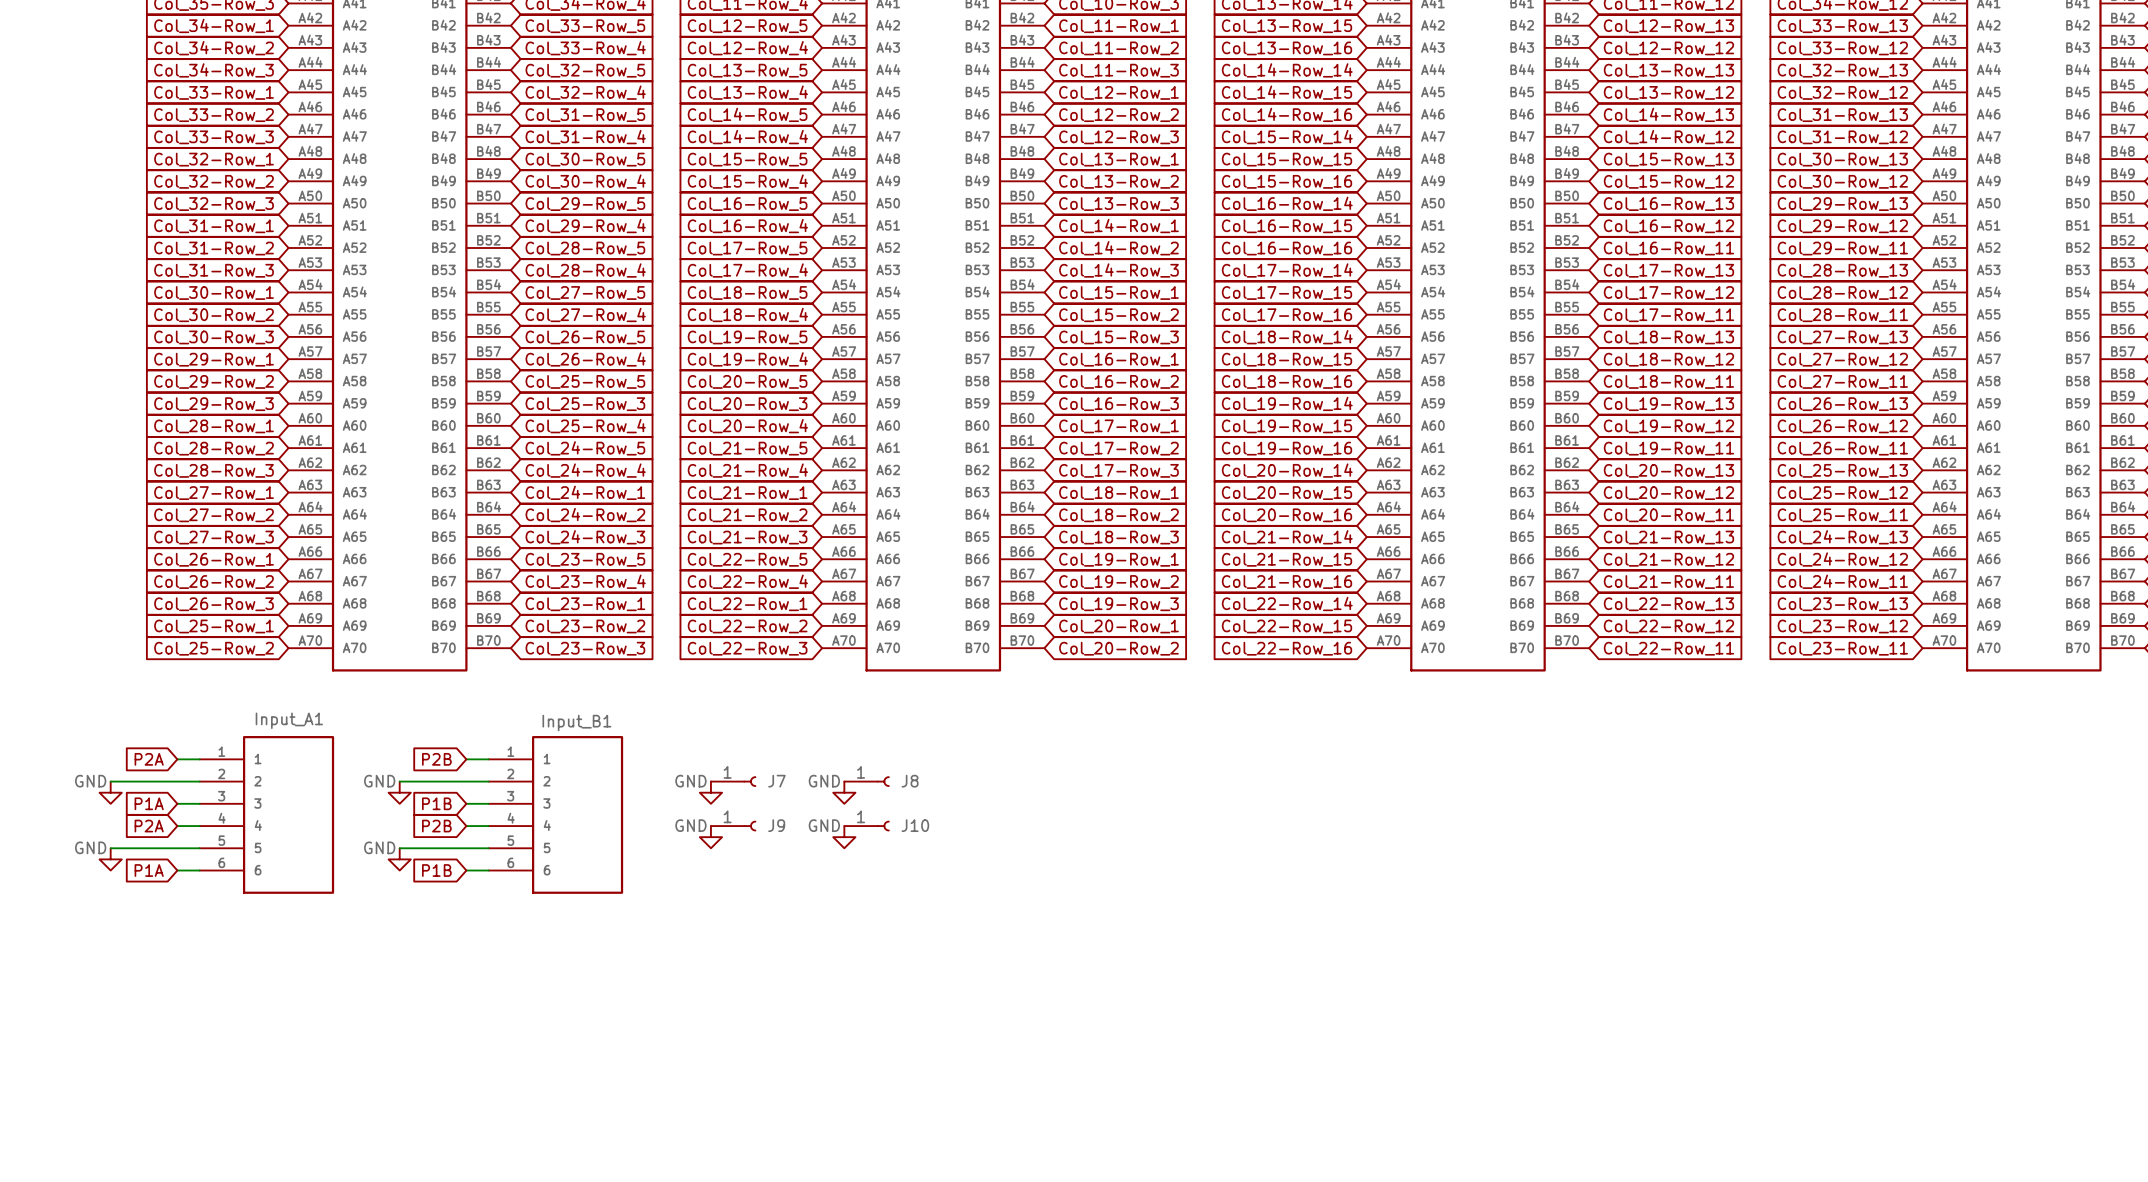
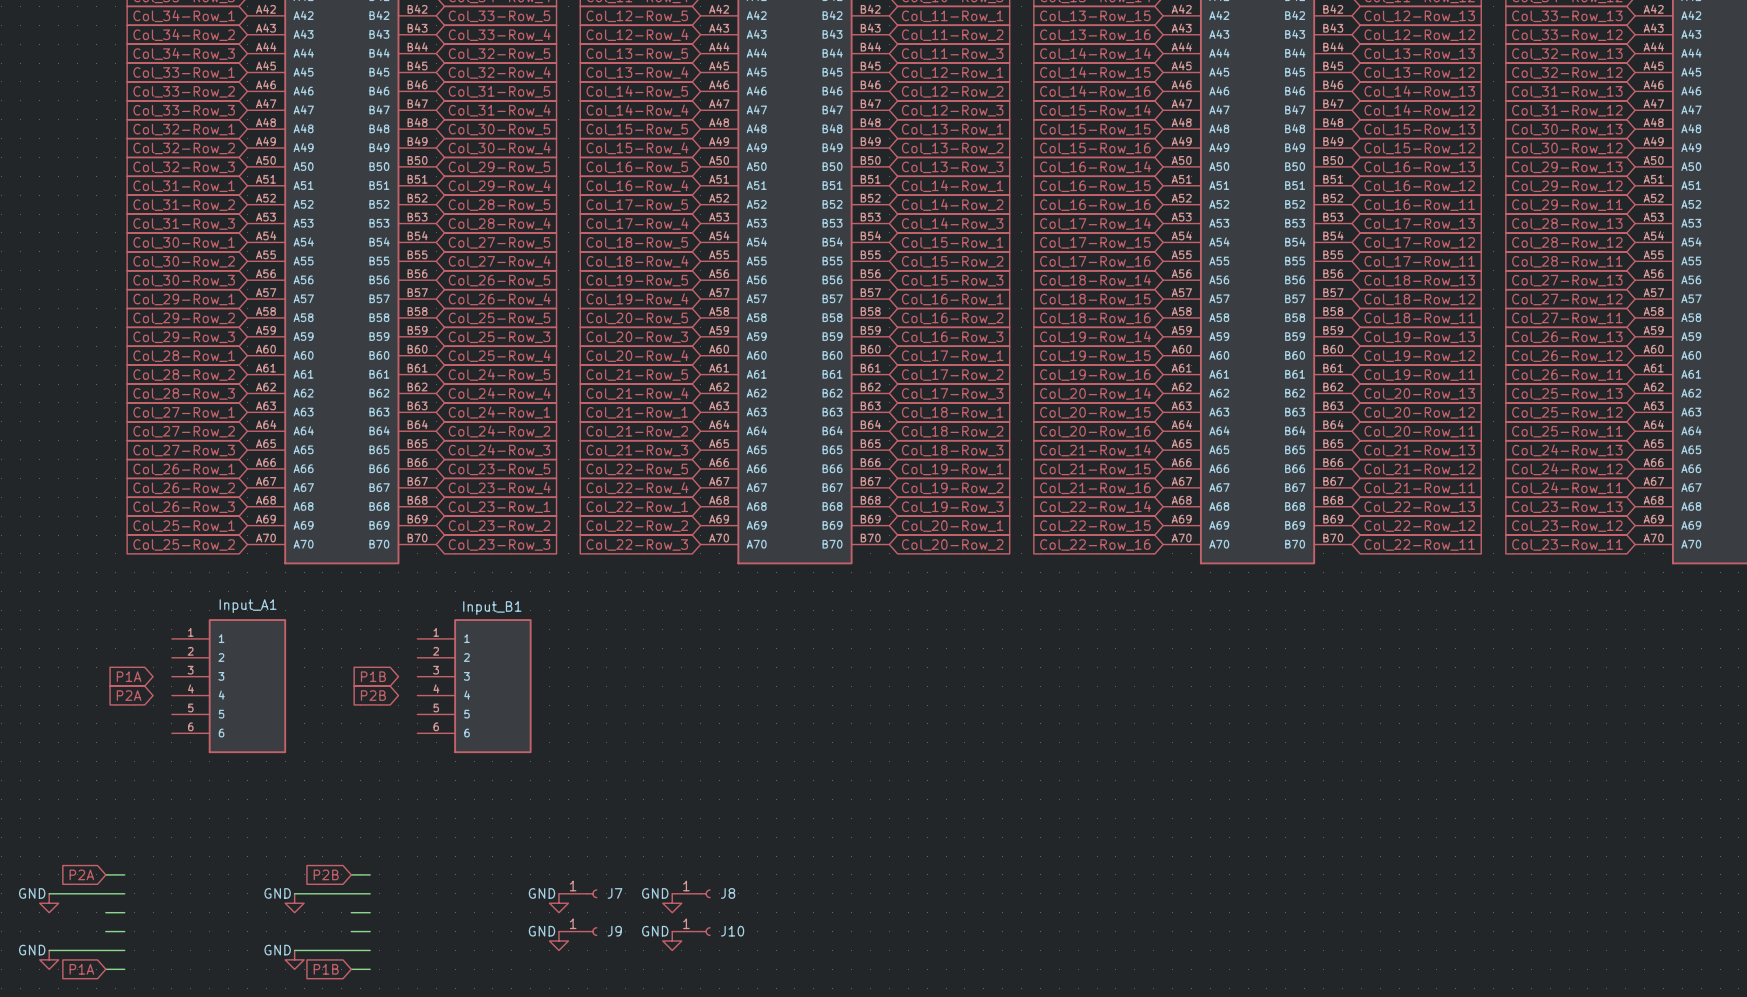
global label: P2A (149, 759) -> none
wire: (177, 759) (199, 759) -> none
global label: P2B (436, 759) -> none
wire: (466, 759) (488, 759) -> none
wire: (110, 781) (199, 781) -> none
wire: (399, 781) (488, 781) -> none
J7 position: (733, 781) -> (578, 893)
J8 position: (866, 781) -> (691, 893)
power symbol: GND (110, 792) -> none
power symbol: GND (399, 792) -> none
power symbol: GND (710, 792) -> none
power symbol: GND (844, 792) -> none
wire: (177, 803) (199, 803) -> none
wire: (466, 803) (488, 803) -> none
wire: (177, 826) (199, 826) -> (105, 874) (124, 874)
wire: (466, 826) (488, 826) -> (351, 874) (370, 874)
J9 position: (733, 826) -> (578, 931)
J10 position: (866, 826) -> (691, 931)
power symbol: GND (710, 837) -> none
power symbol: GND (844, 837) -> none
wire: (110, 848) (199, 848) -> (49, 893) (124, 893)
wire: (399, 848) (488, 848) -> (294, 893) (370, 893)
power symbol: GND (110, 859) -> none
power symbol: GND (399, 859) -> none
global label: P1A (149, 870) -> none
wire: (177, 870) (199, 870) -> (105, 912) (124, 912)
global label: P1B (436, 870) -> none
wire: (466, 870) (488, 870) -> (351, 912) (370, 912)
global label: none -> P2A (81, 874)
global label: none -> P2B (326, 874)
power symbol: none -> GND (49, 903)
power symbol: none -> GND (294, 903)
power symbol: none -> GND (558, 903)
power symbol: none -> GND (672, 903)
wire: none -> (105, 931) (124, 931)
wire: none -> (351, 931) (370, 931)
power symbol: none -> GND (558, 941)
power symbol: none -> GND (672, 941)
wire: none -> (49, 950) (124, 950)
wire: none -> (294, 950) (370, 950)
power symbol: none -> GND (49, 959)
power symbol: none -> GND (294, 959)
global label: none -> P1A (81, 969)
wire: none -> (105, 969) (124, 969)
global label: none -> P1B (326, 969)
wire: none -> (351, 969) (370, 969)

